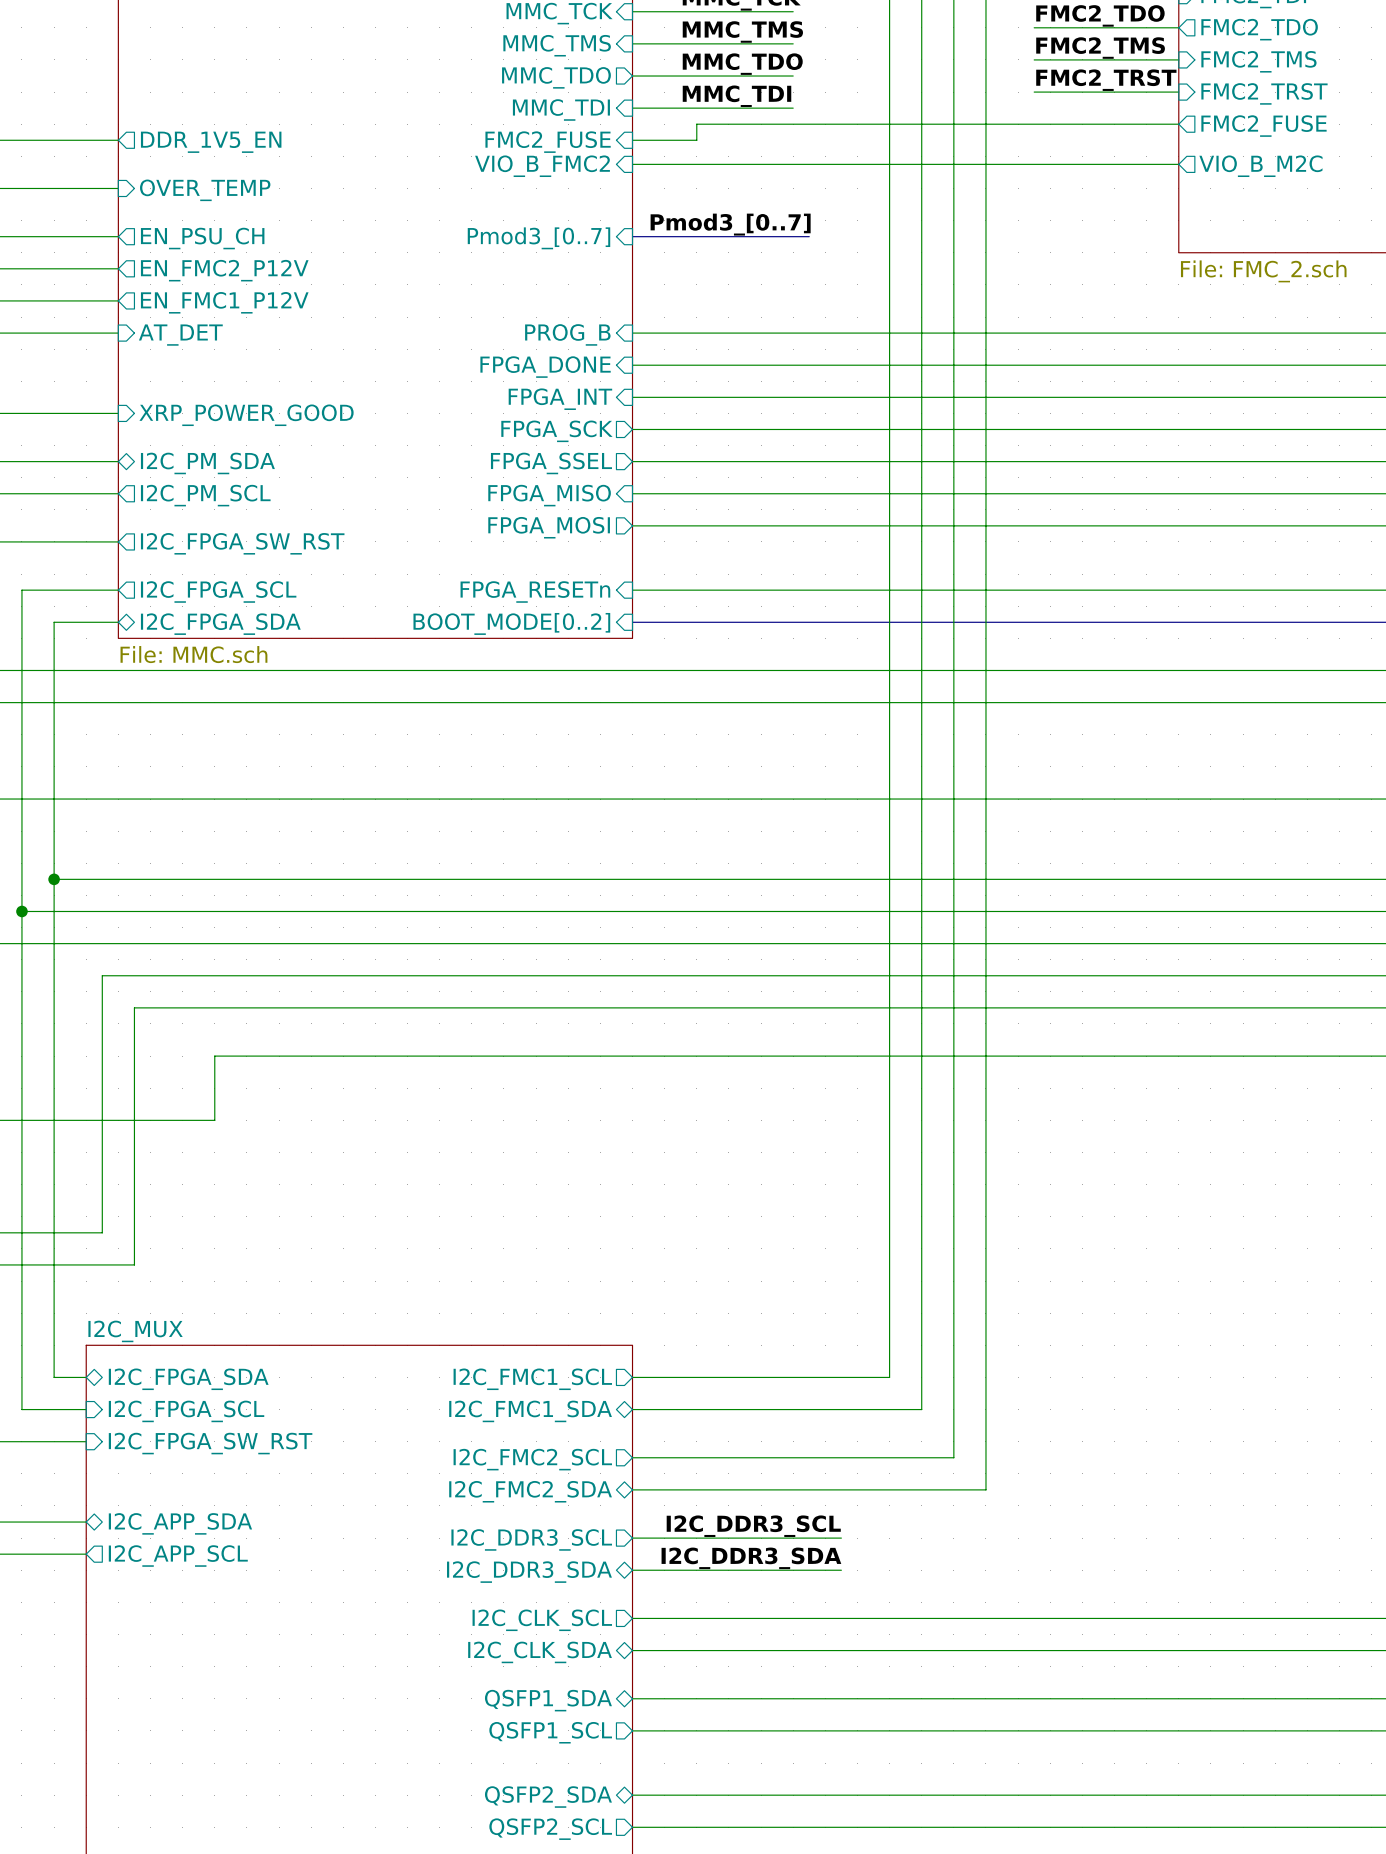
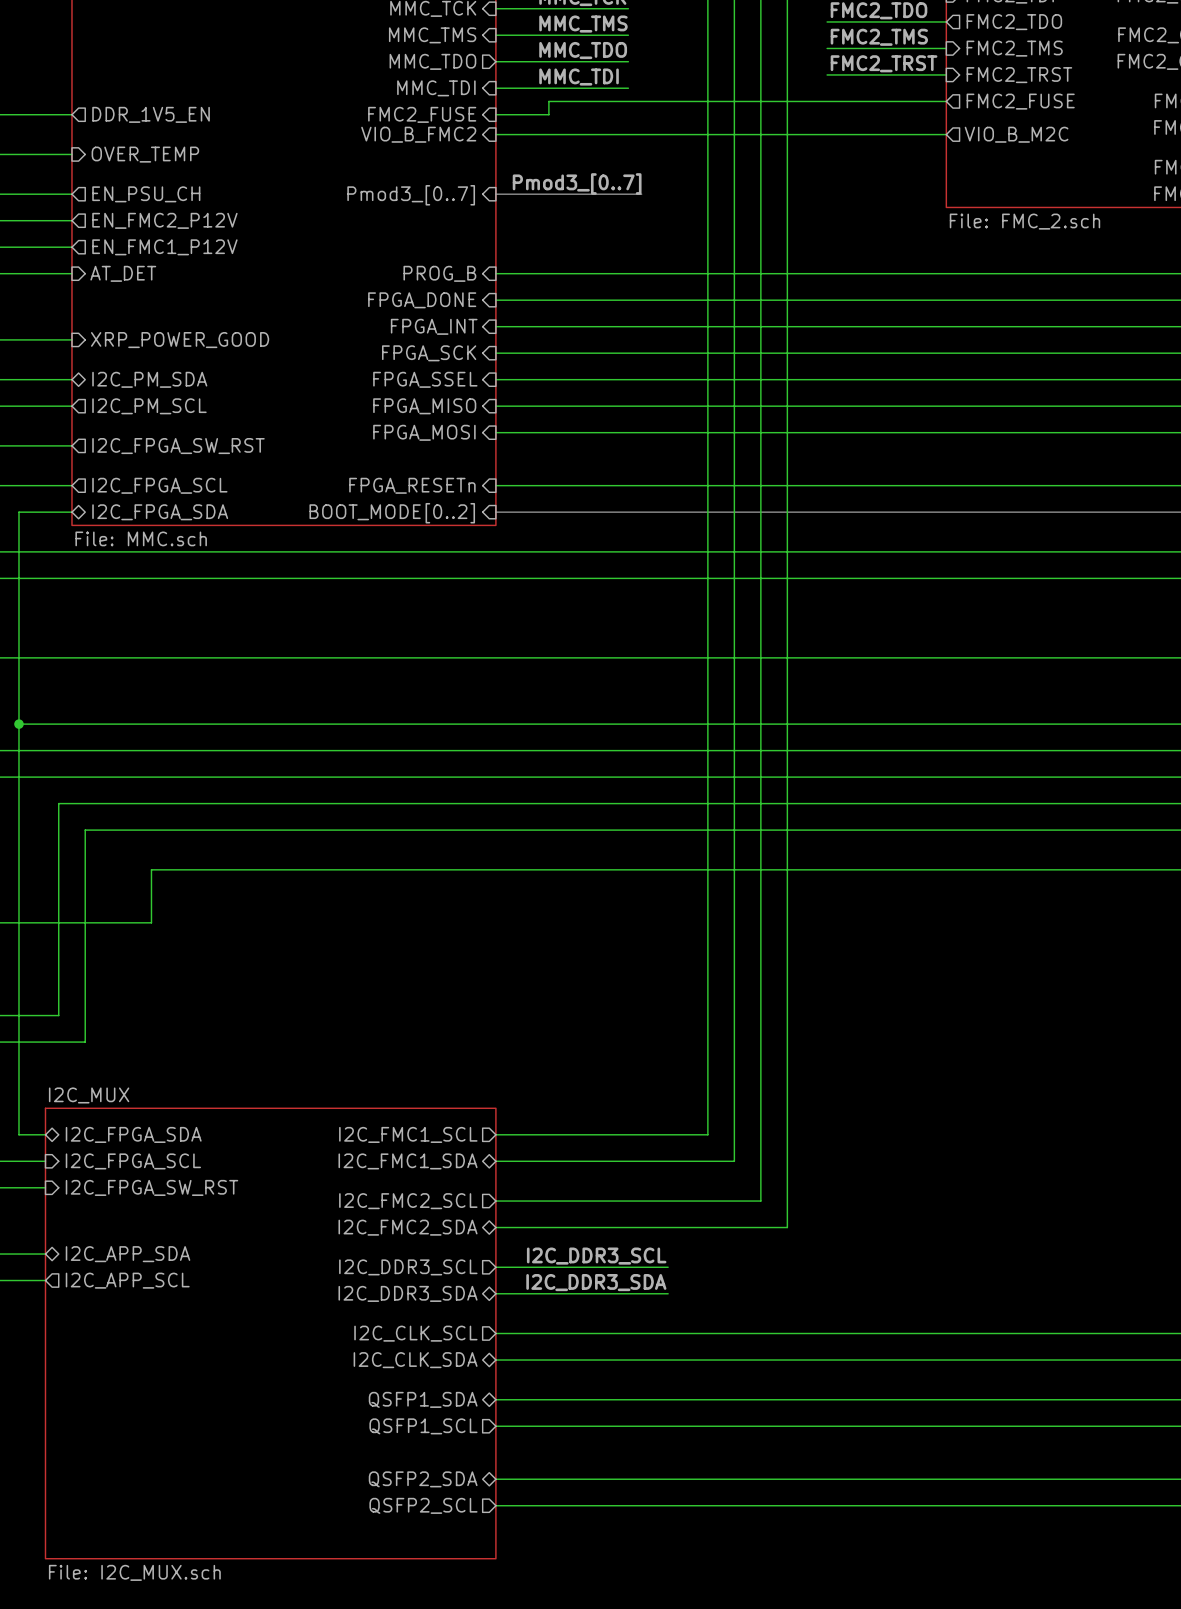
sheet pin shape: output (556, 431) -> input (429, 353)
sheet pin shape: output (551, 463) -> input (425, 379)
sheet pin shape: output (549, 527) -> input (424, 432)

